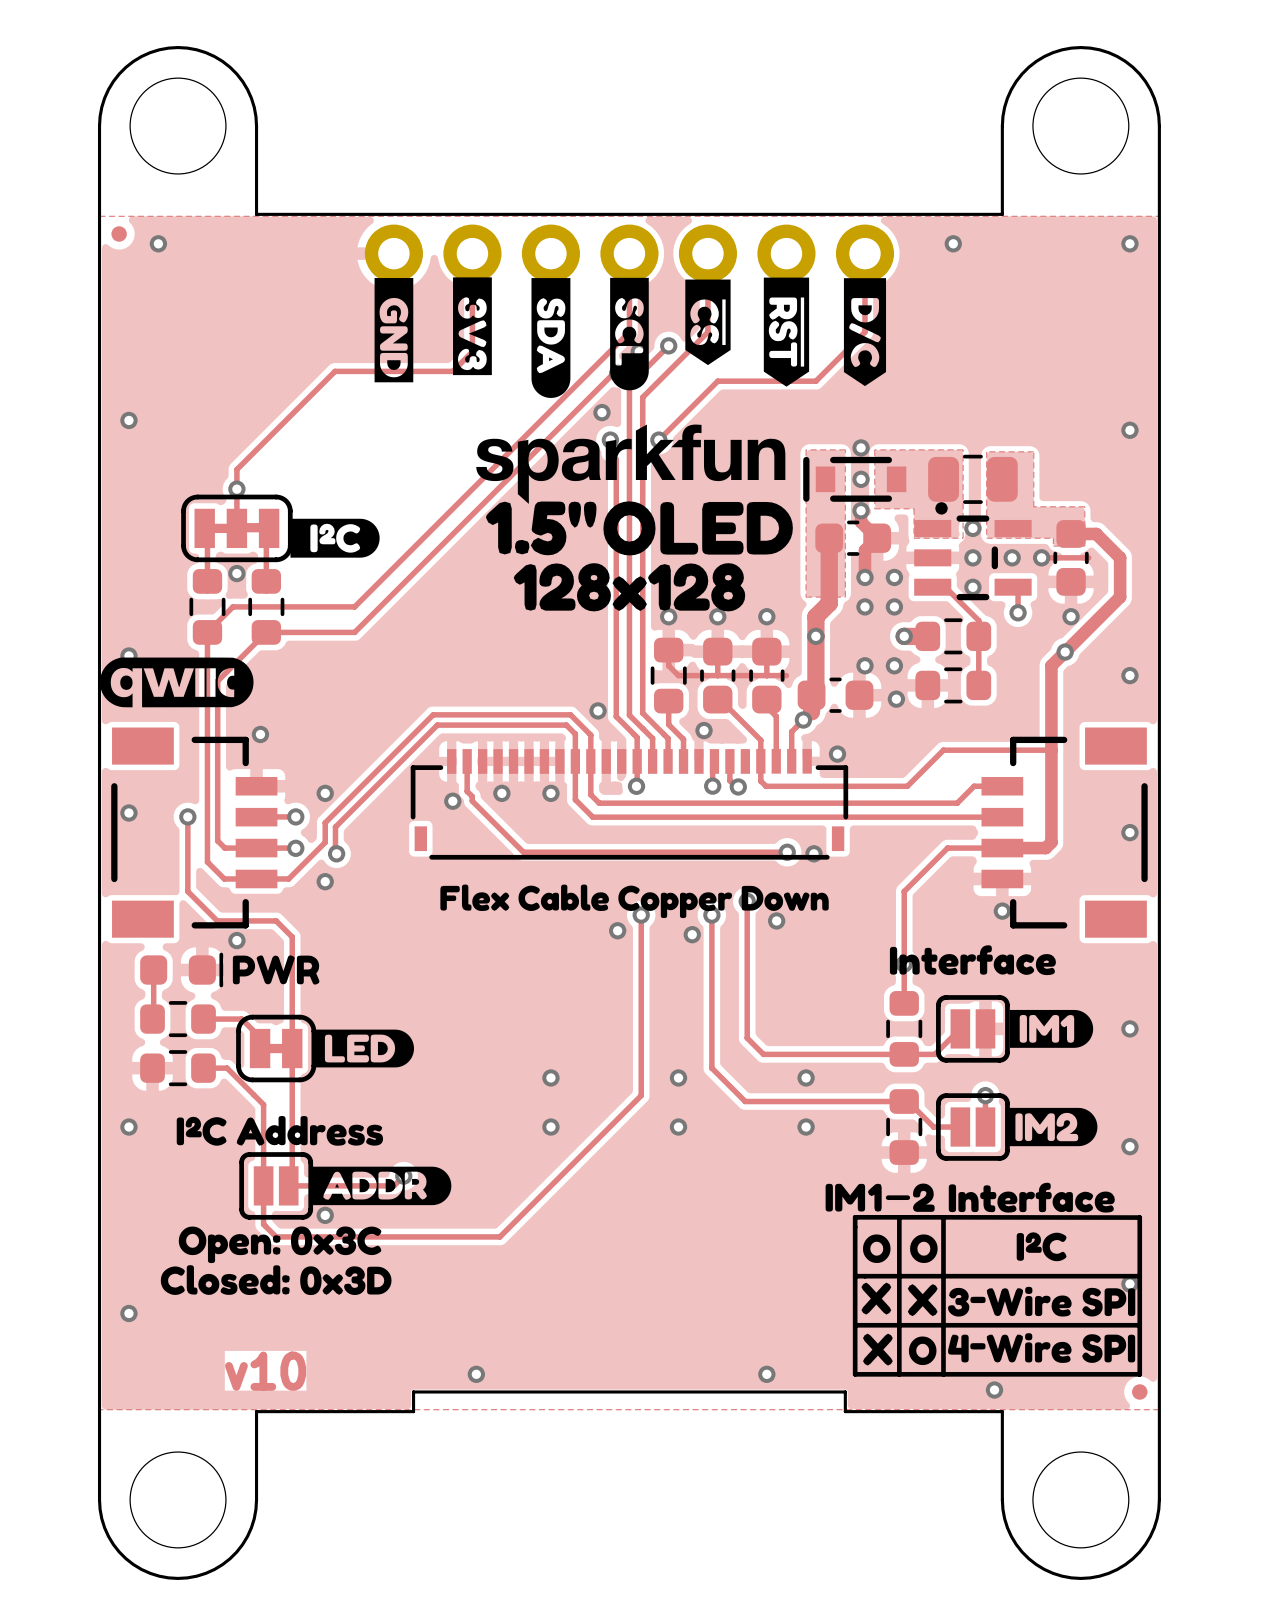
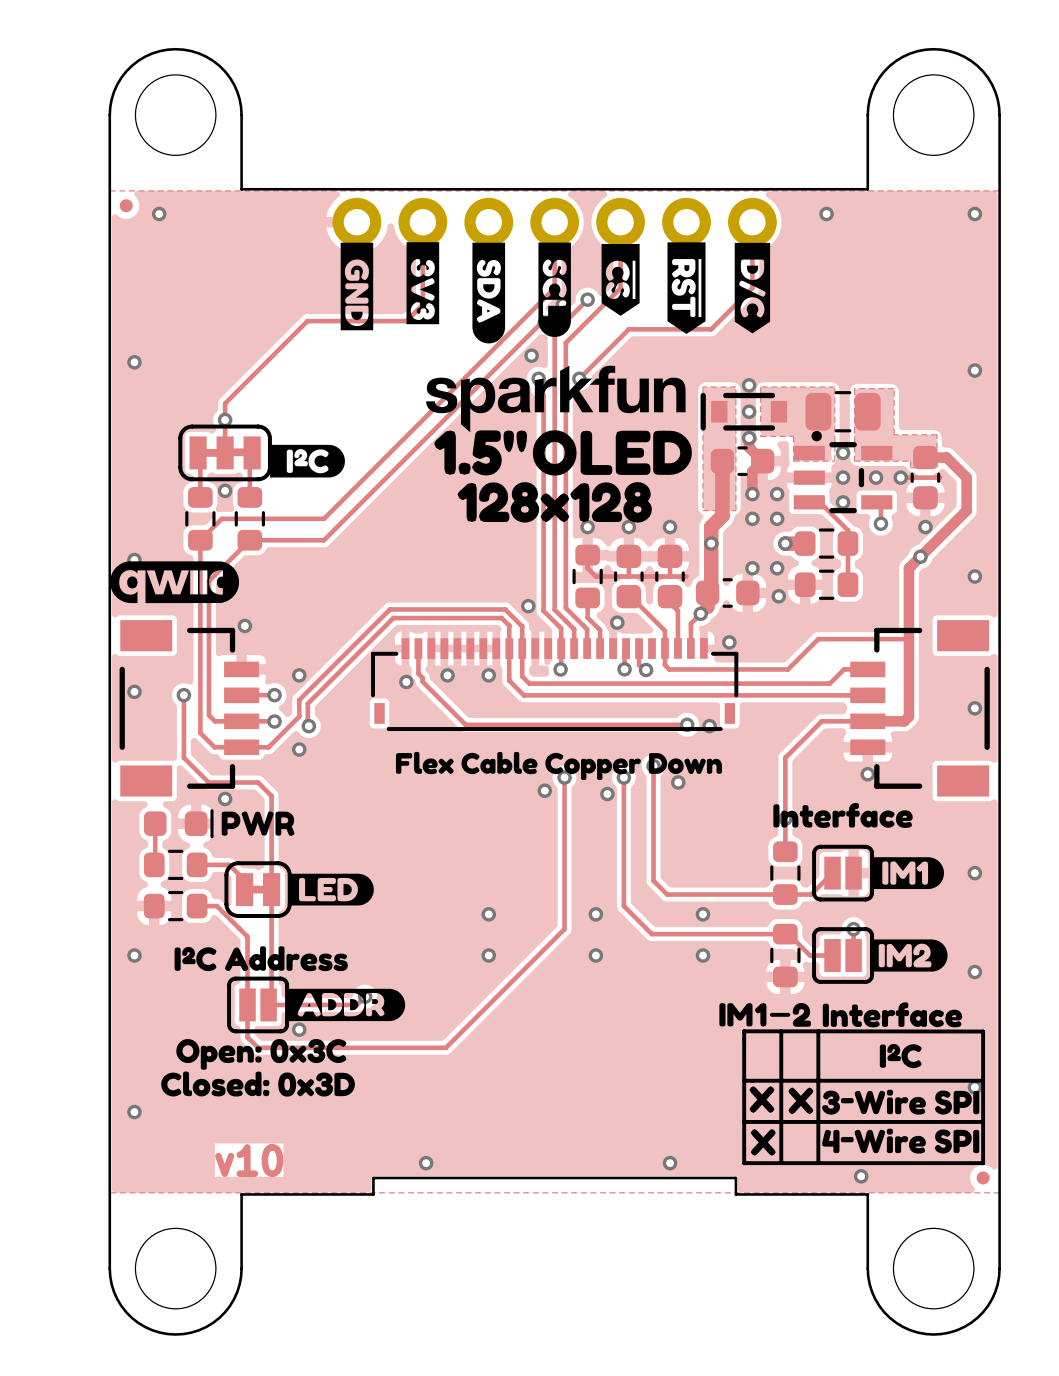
drawing: [862, 1234, 938, 1264] -> none
drawing: [908, 1336, 937, 1366] -> none

